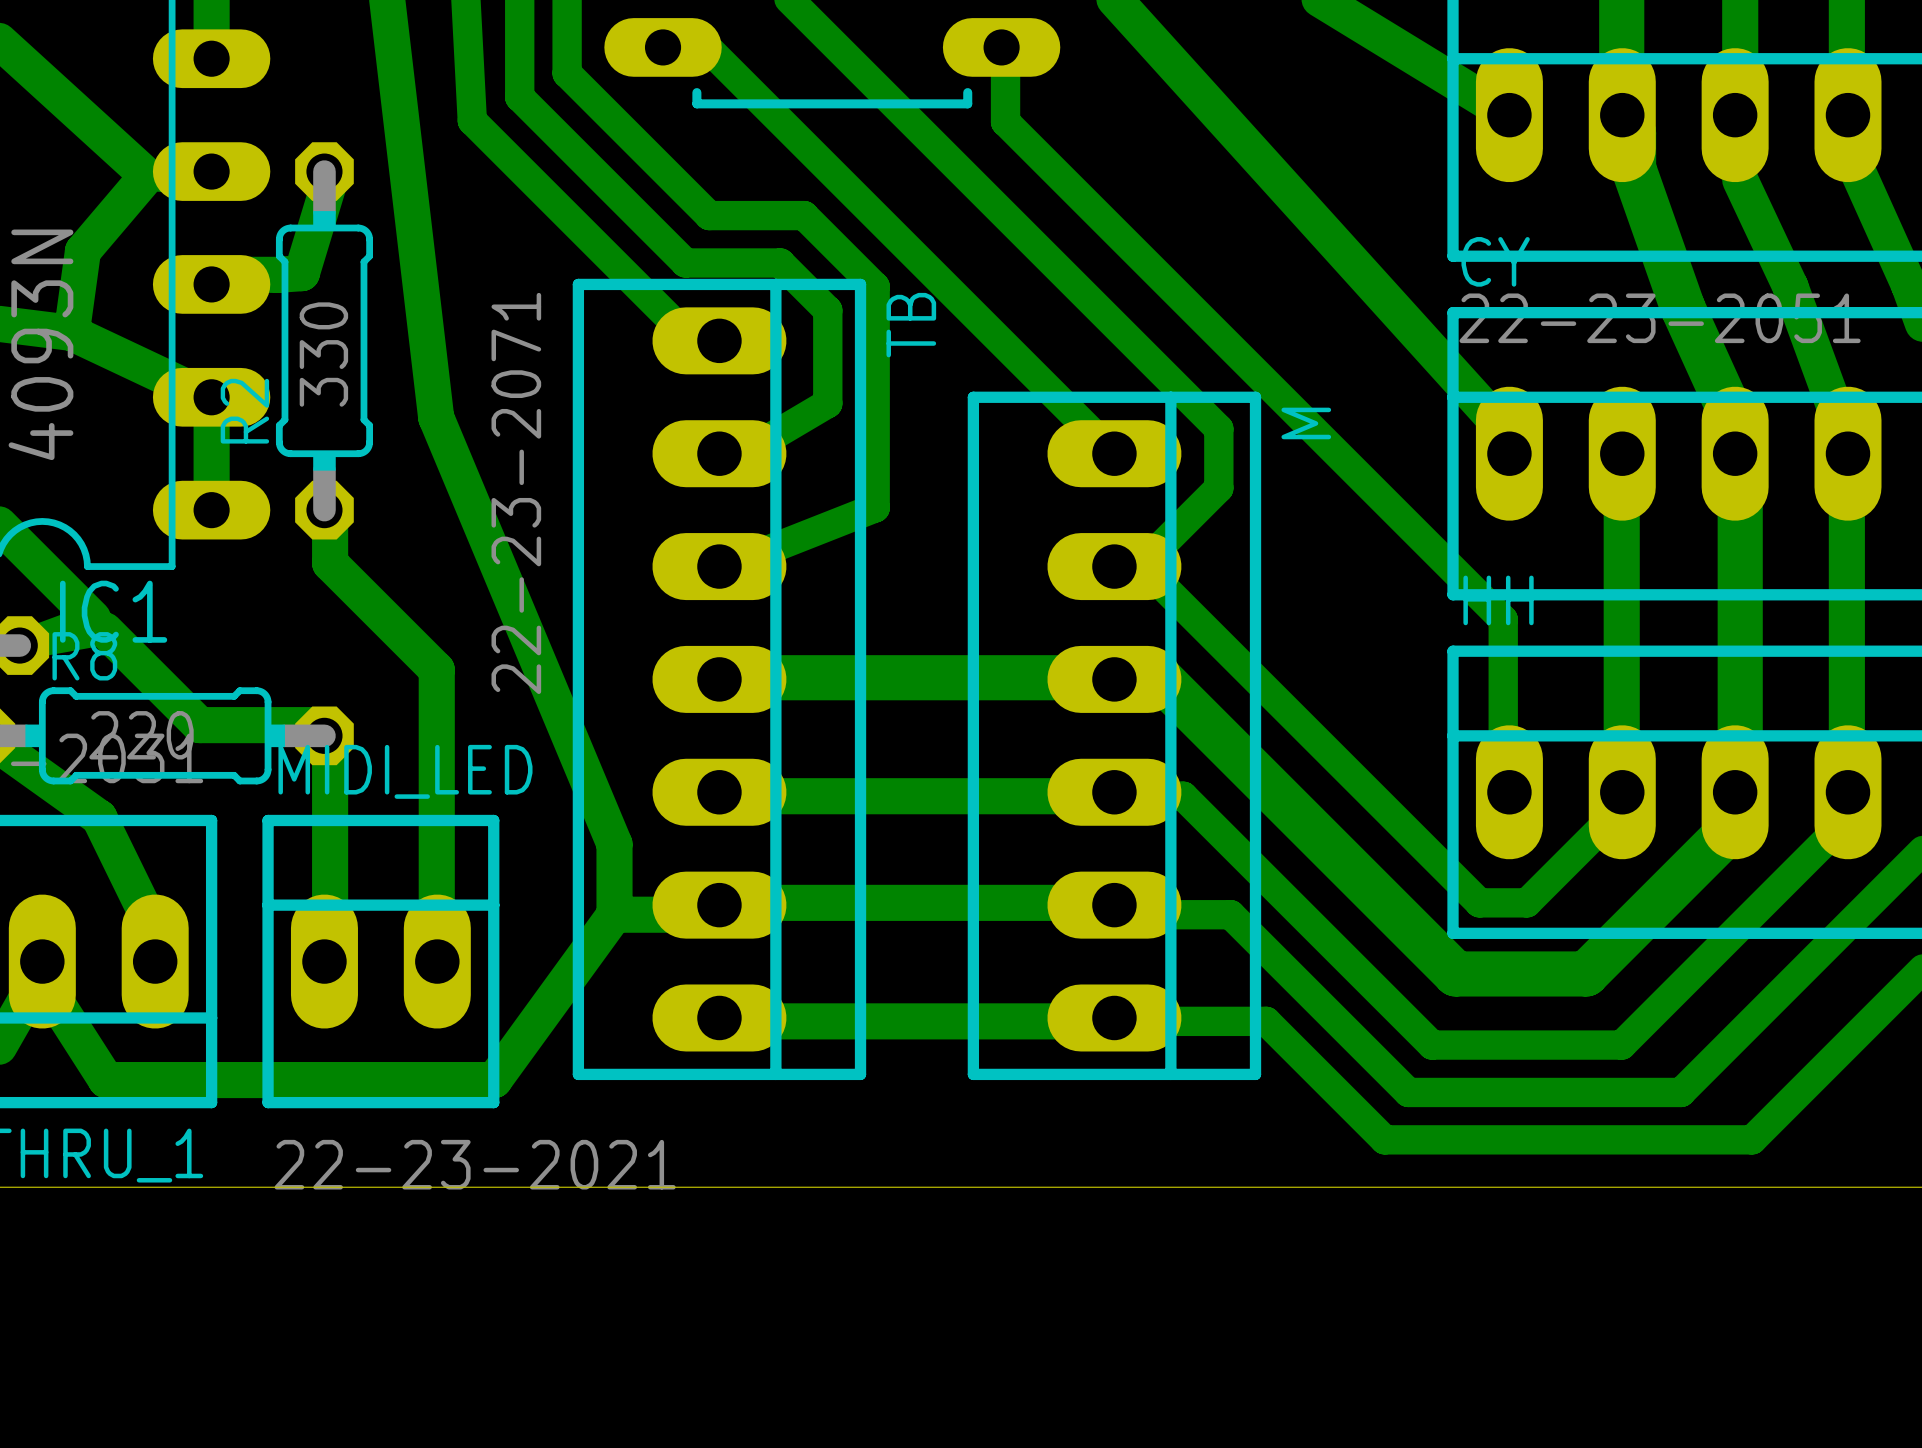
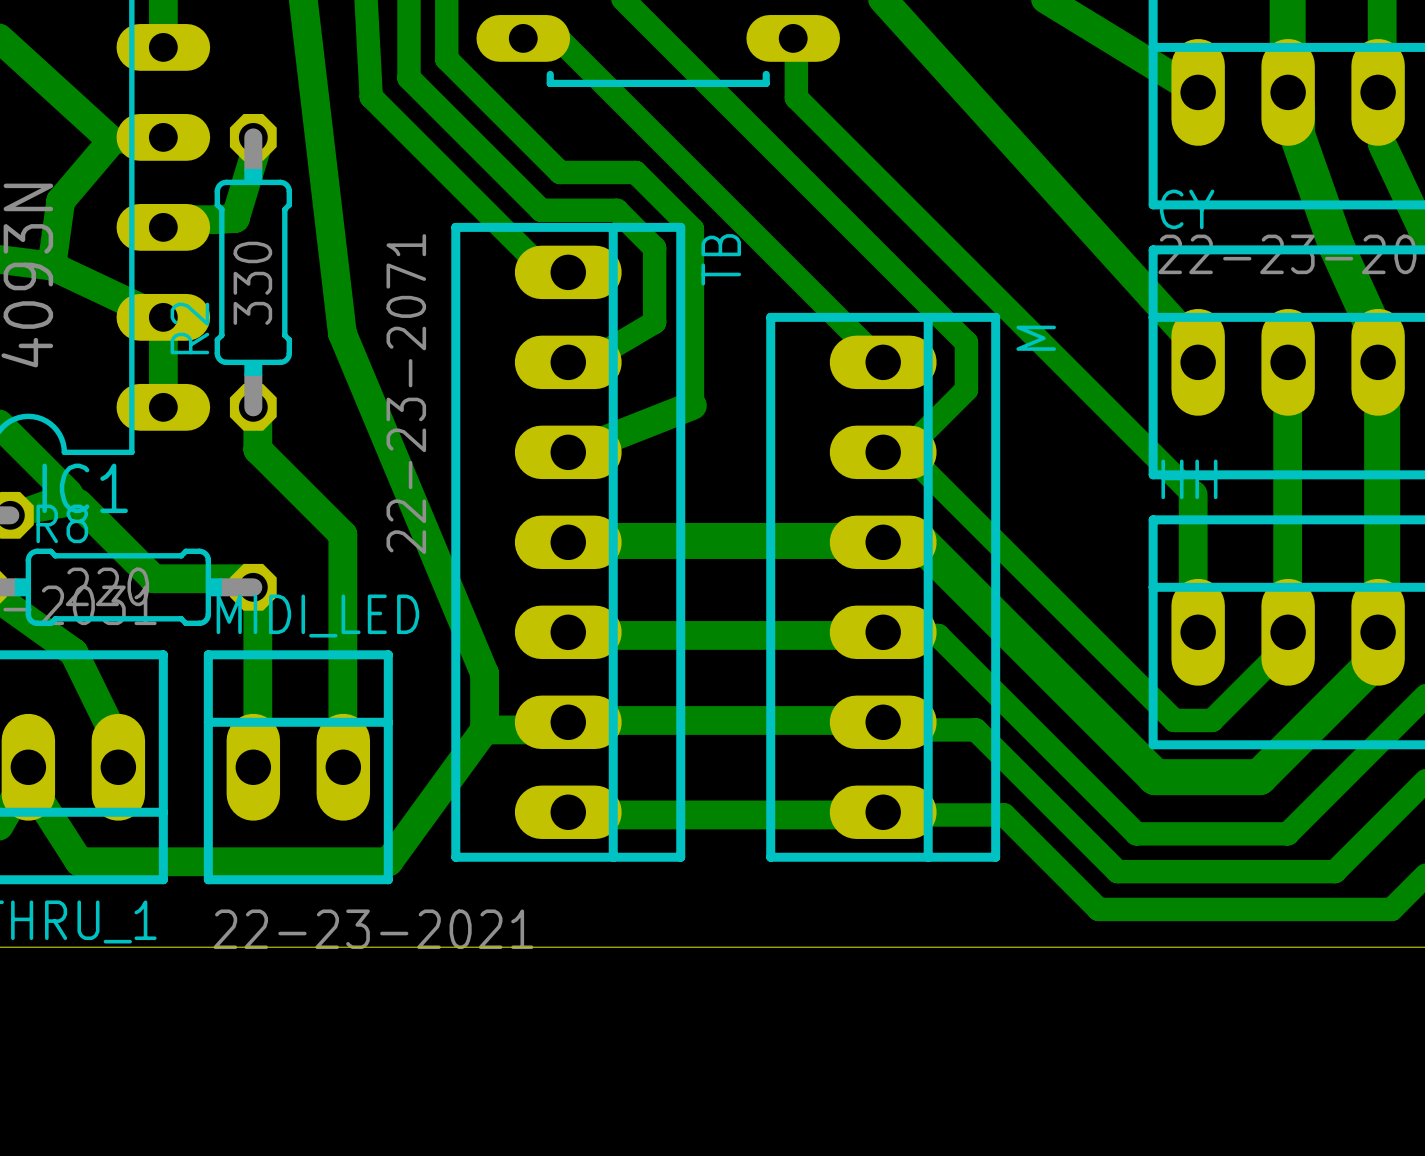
bottom track width: thin (875, 507) (744, 559) -> thick (692, 405) (588, 446)
bottom track width: thin (1503, 619) (1503, 784) -> thick (1193, 494) (1193, 626)

